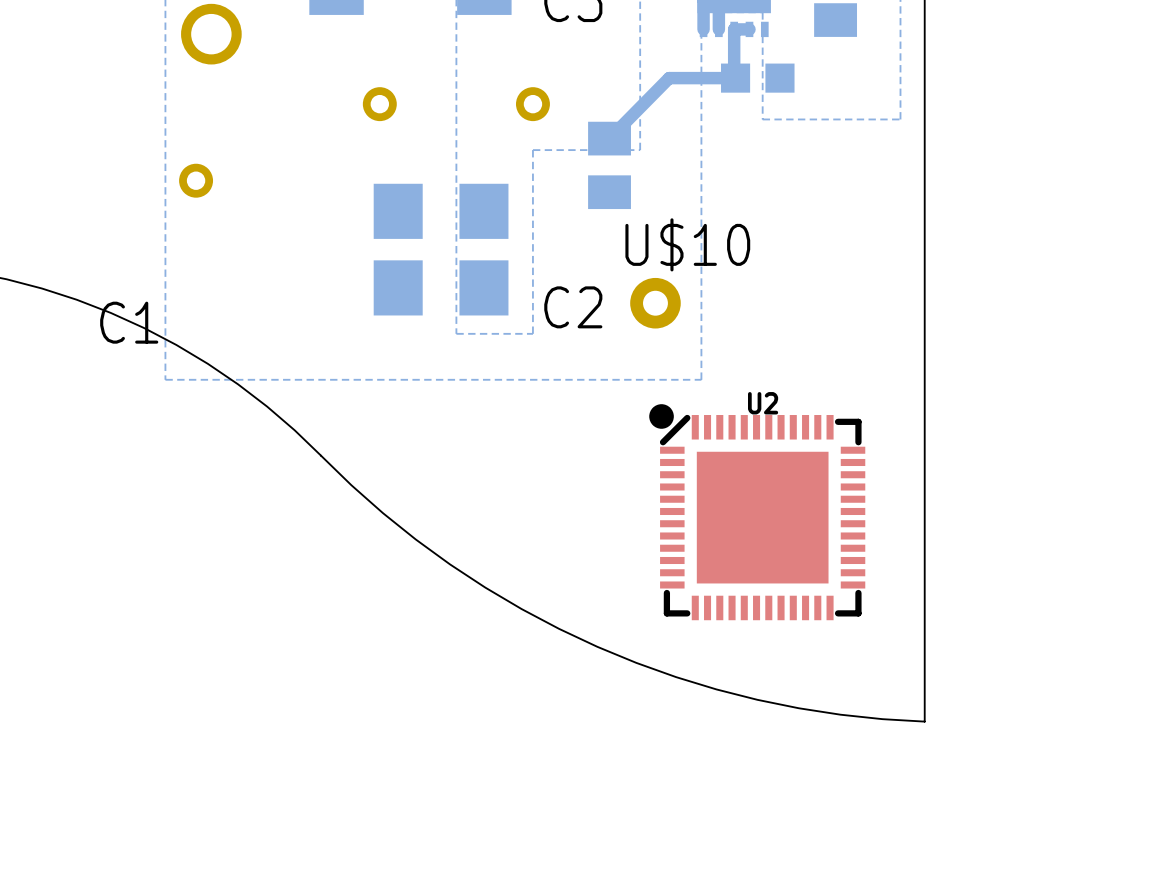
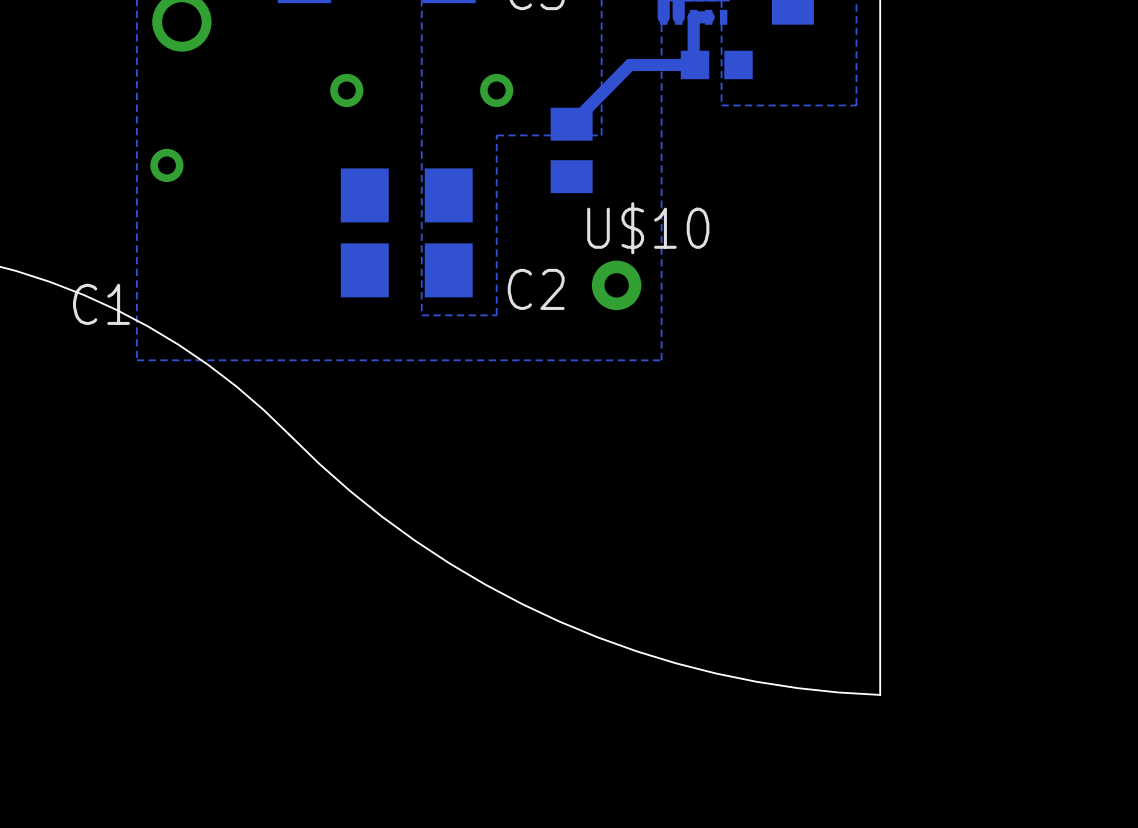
U2: (757, 512) -> none

